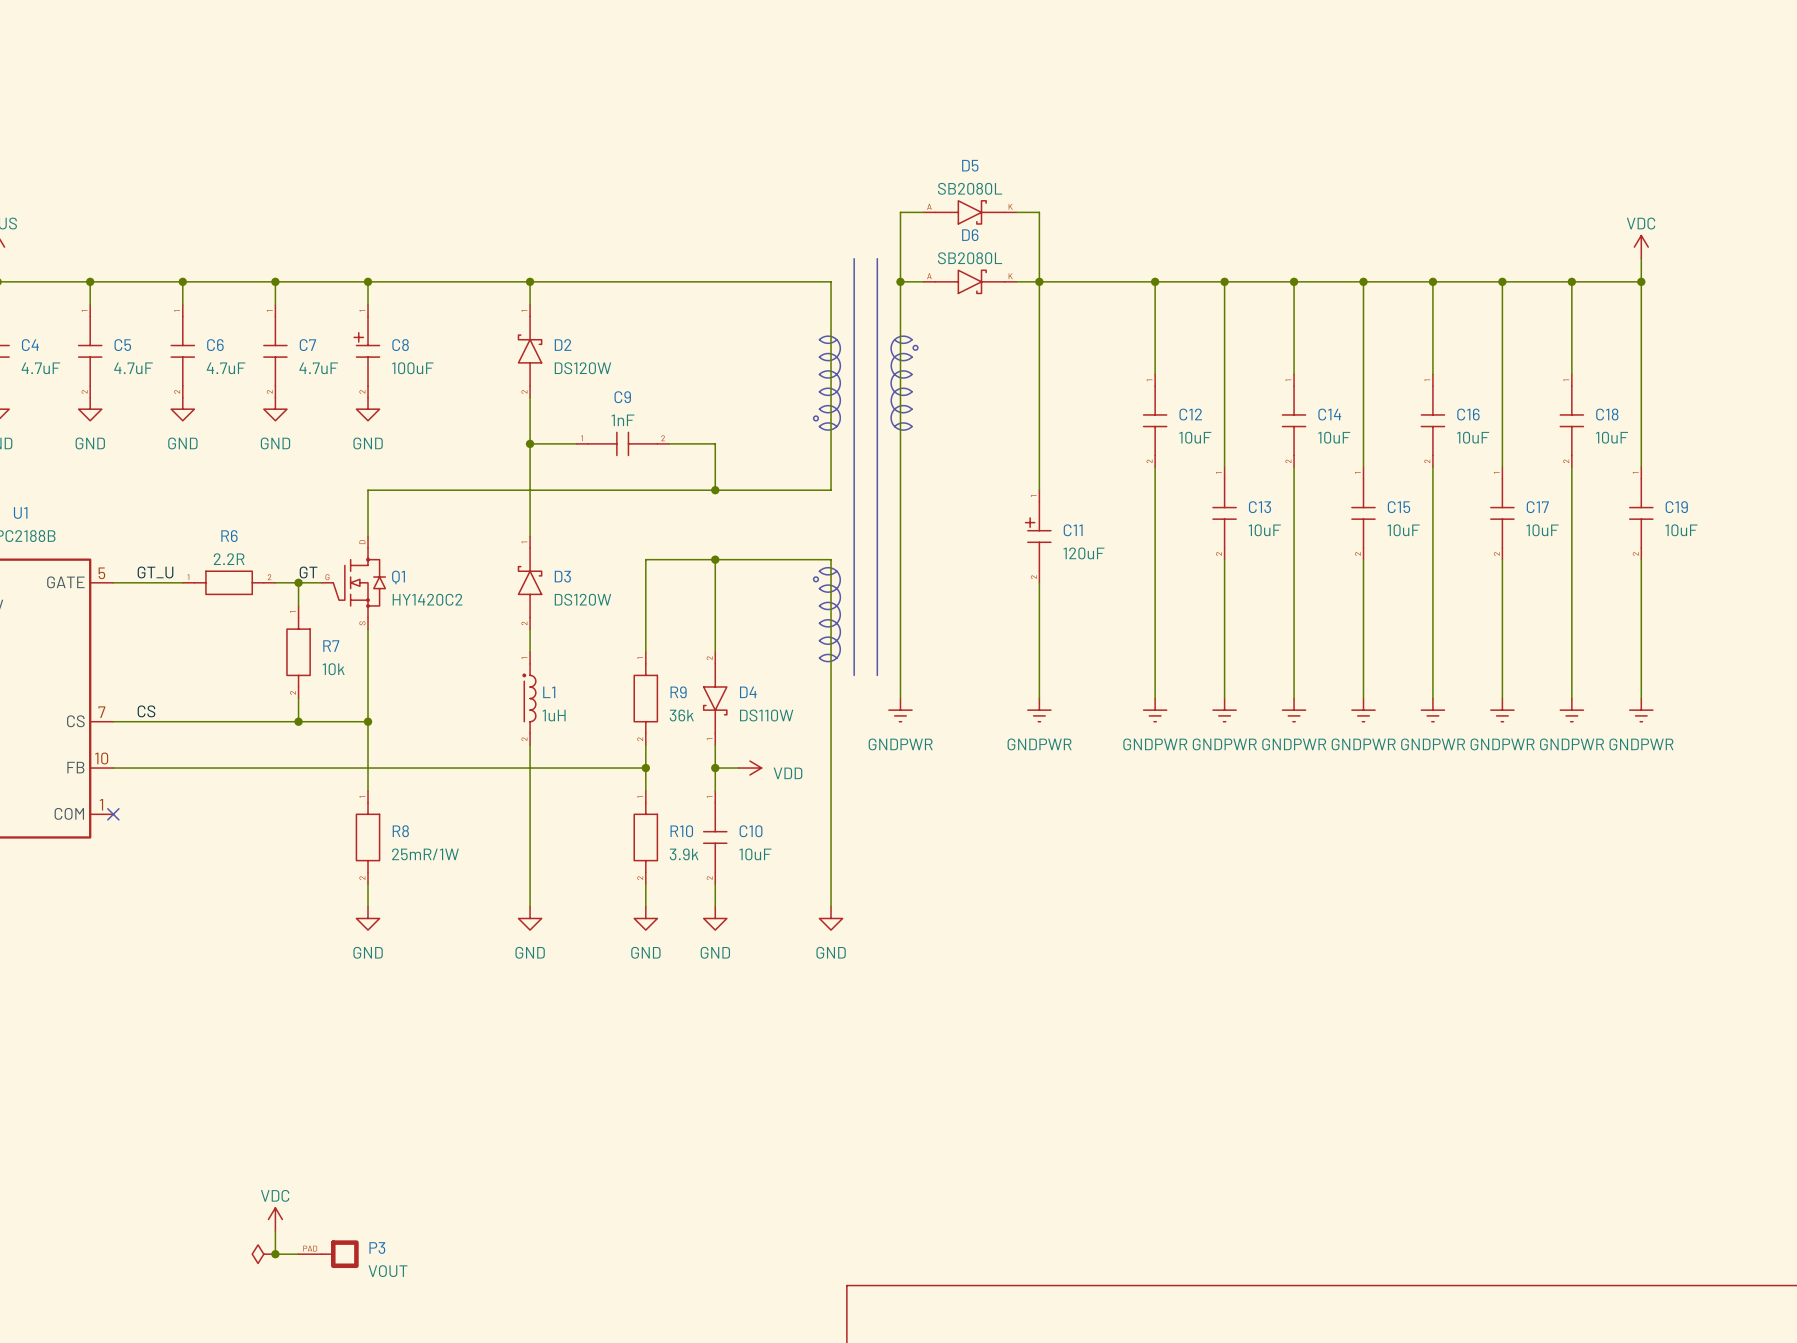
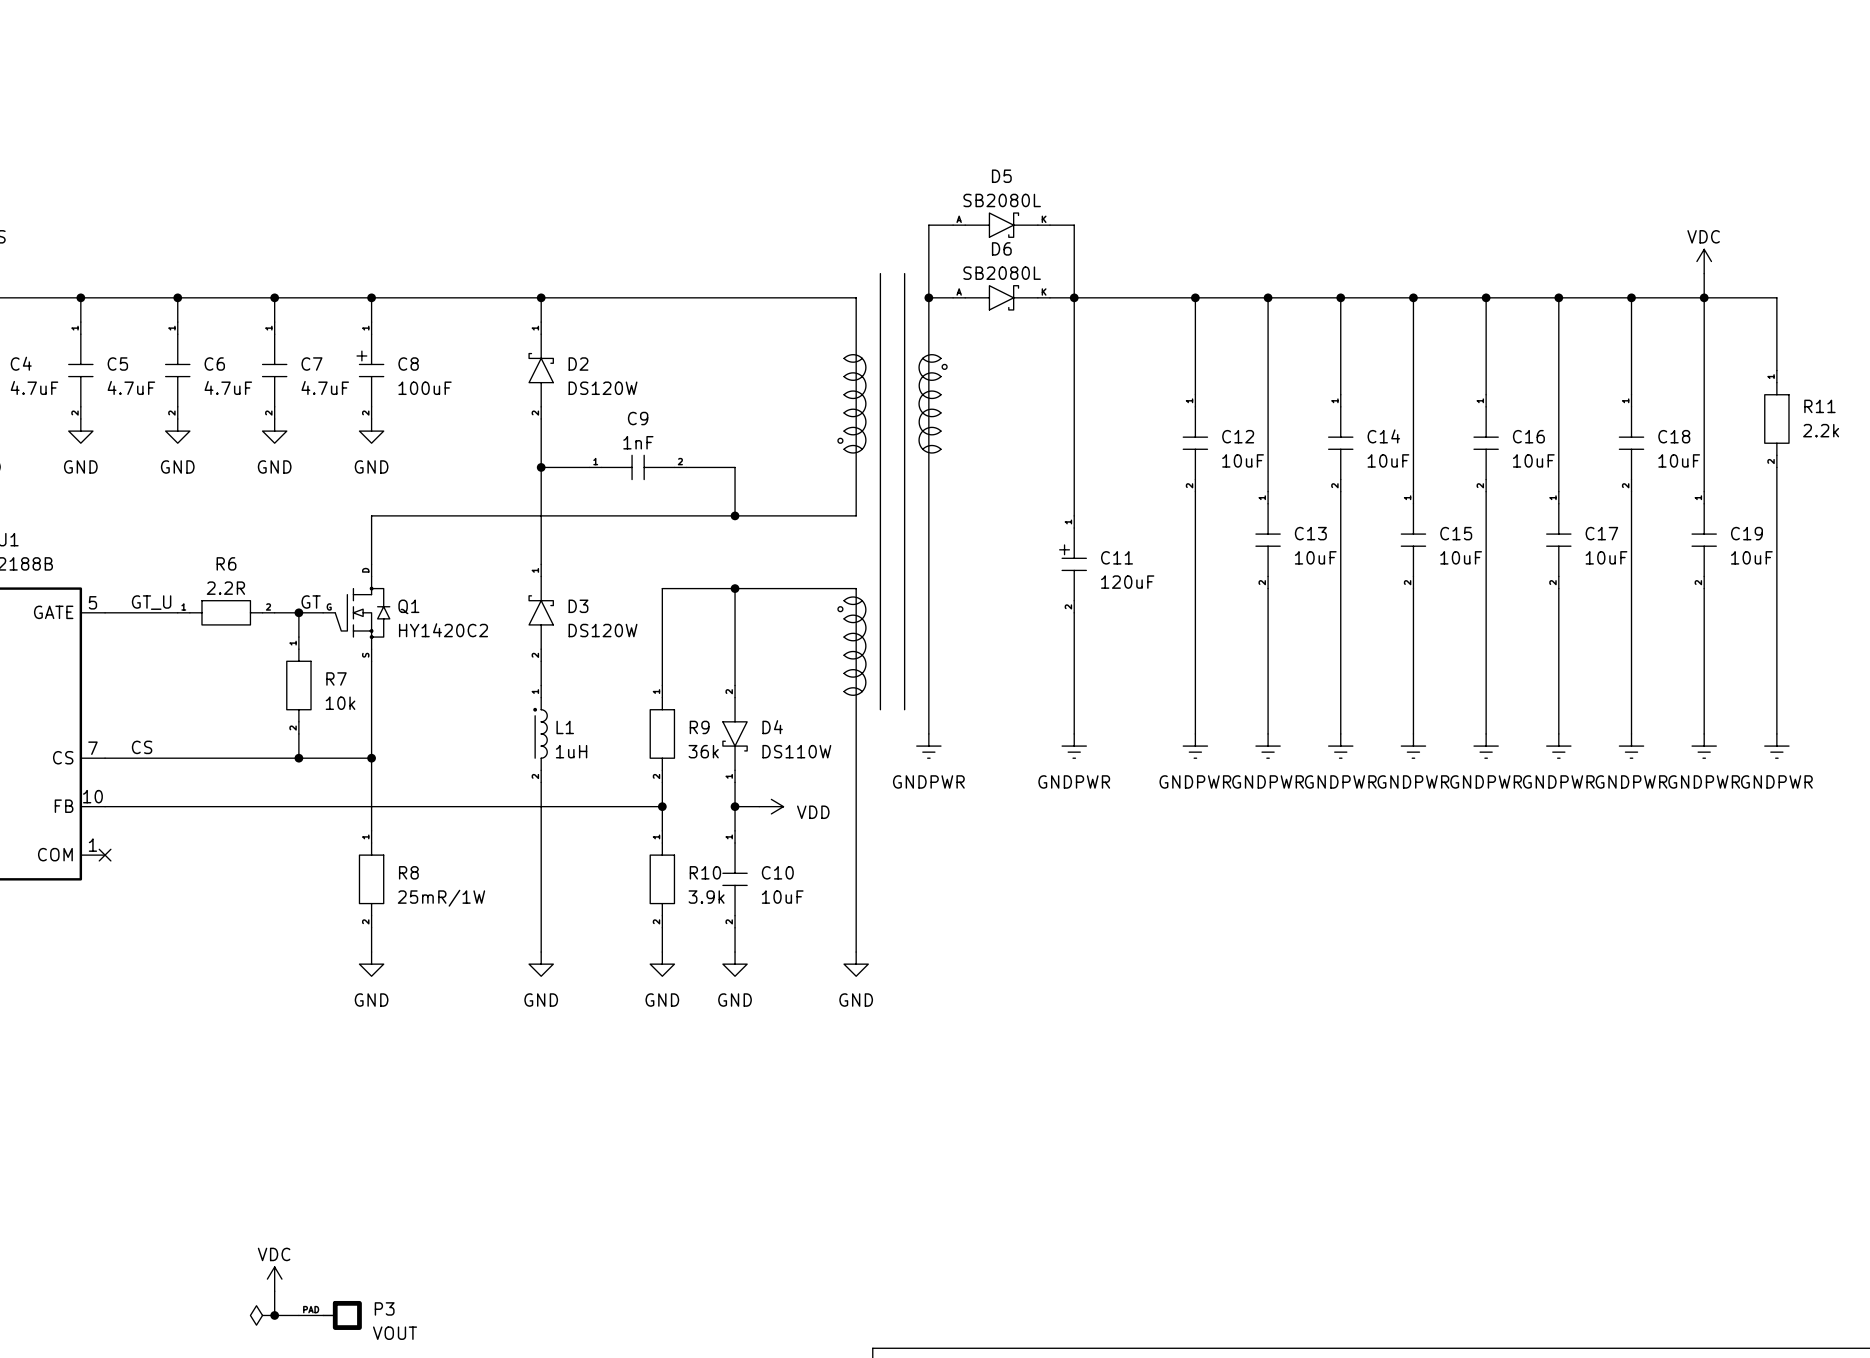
wire: none -> (1704, 297) (1776, 297) (1776, 370)
R11: none -> 2.2k (1776, 418)
wire: none -> (1776, 467) (1776, 733)
power symbol: none -> GNDPWR (1776, 746)

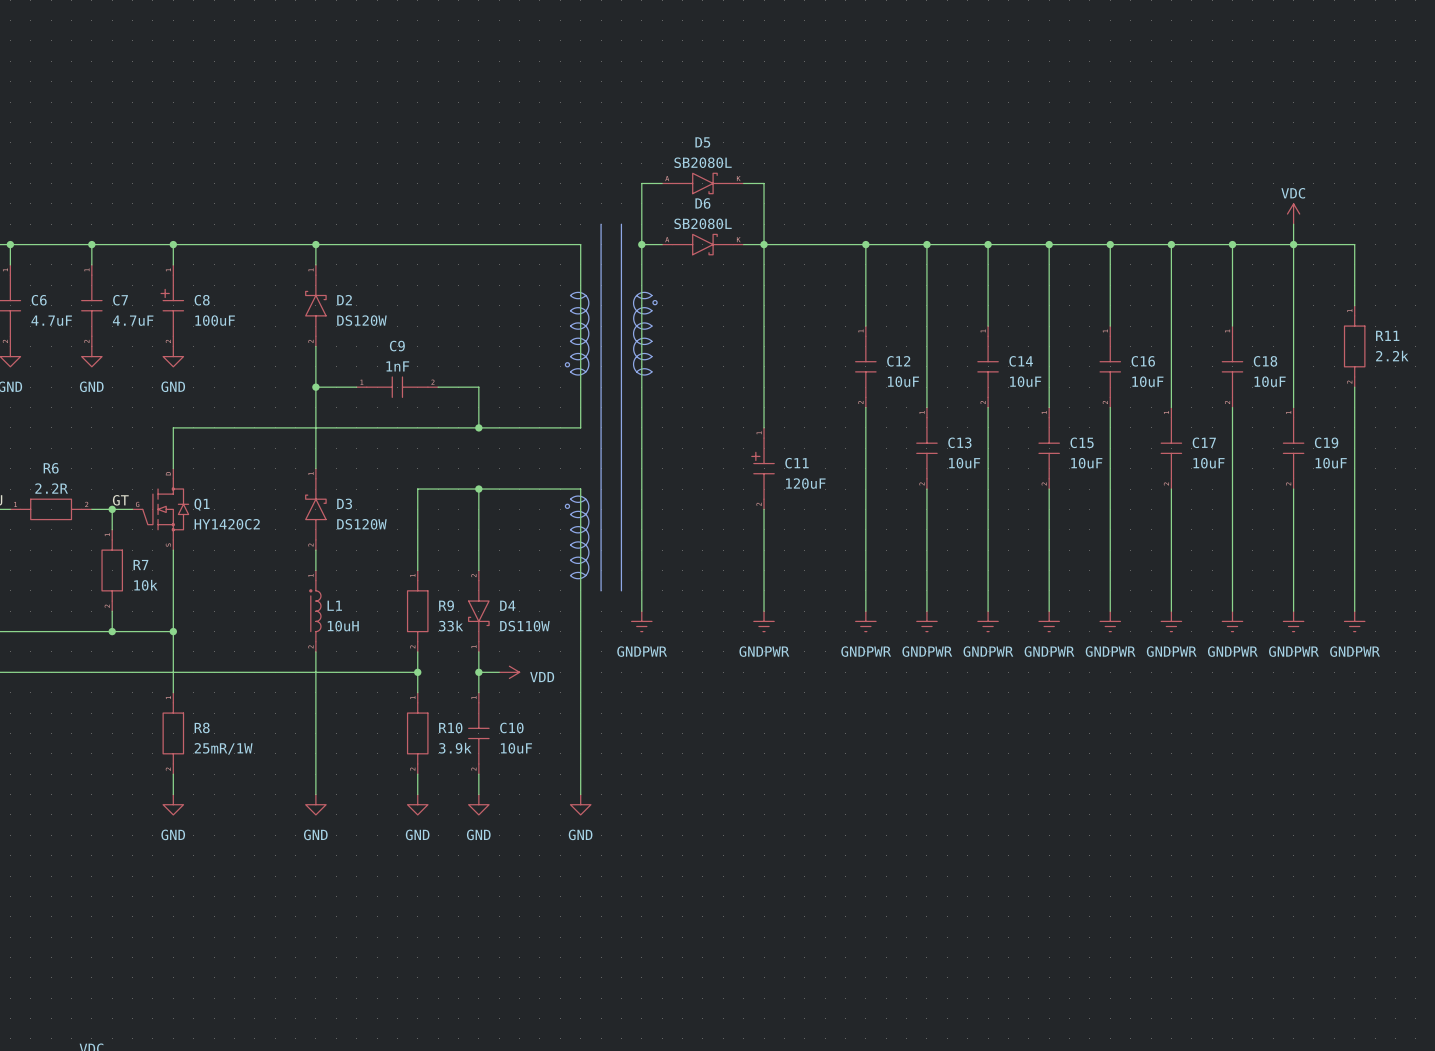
L1 value: 1uH (571, 751) -> 10uH (343, 626)
R9 value: 36k (703, 751) -> 33k (451, 626)

